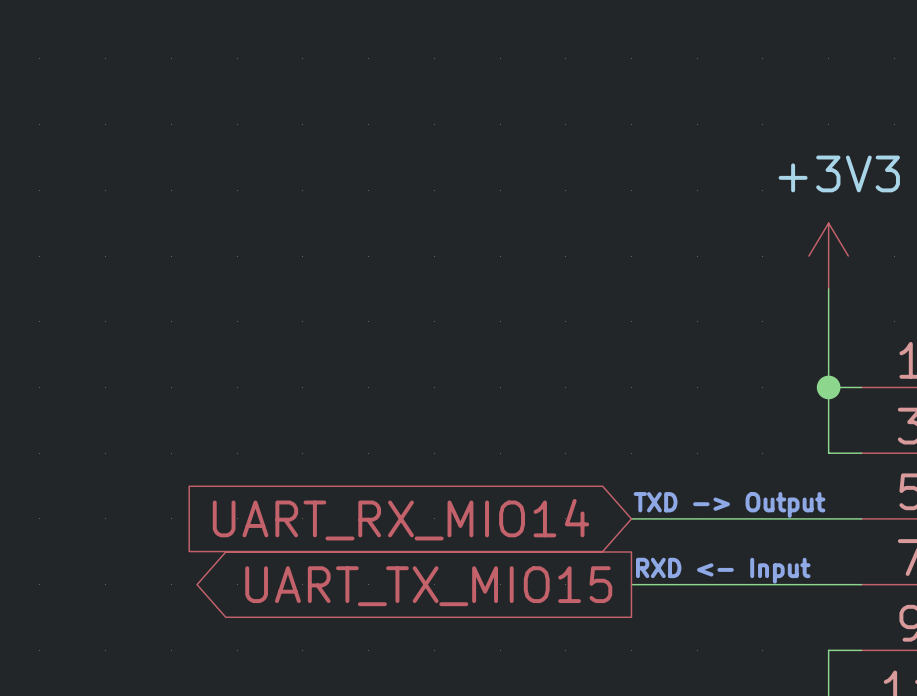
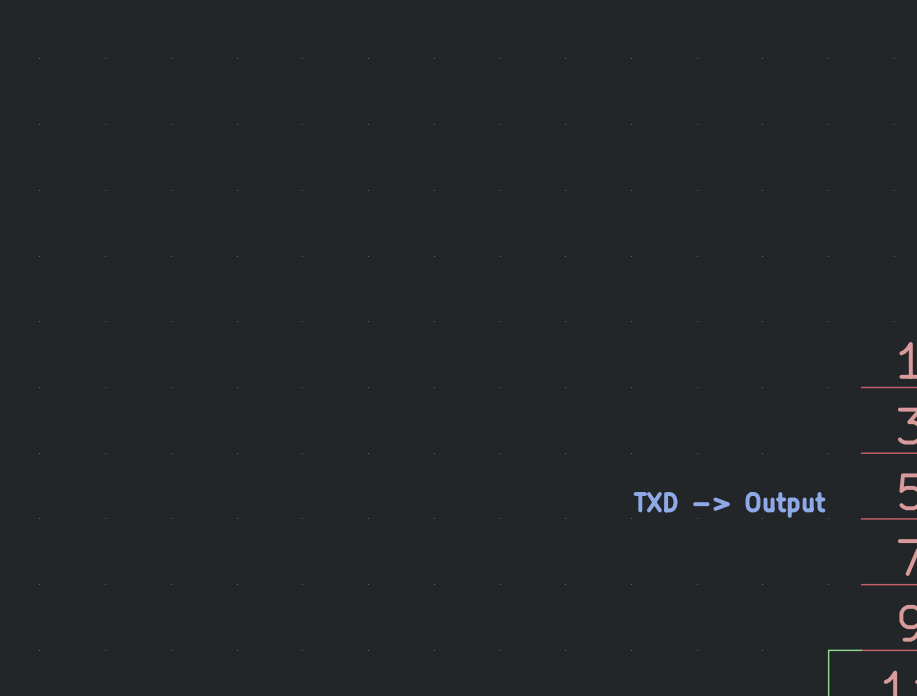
power symbol: +3V3 (828, 256) -> none
wire: (828, 288) (828, 453) (861, 453) -> none
wire: (828, 387) (861, 387) -> none
junction: (828, 387) -> none
wire: (631, 518) (861, 518) -> none
global label: UART_RX_MIO14 (400, 519) -> none
text: RXD <- Input (723, 570) -> none
wire: (631, 584) (861, 584) -> none
global label: UART_TX_MIO15 (428, 586) -> none

